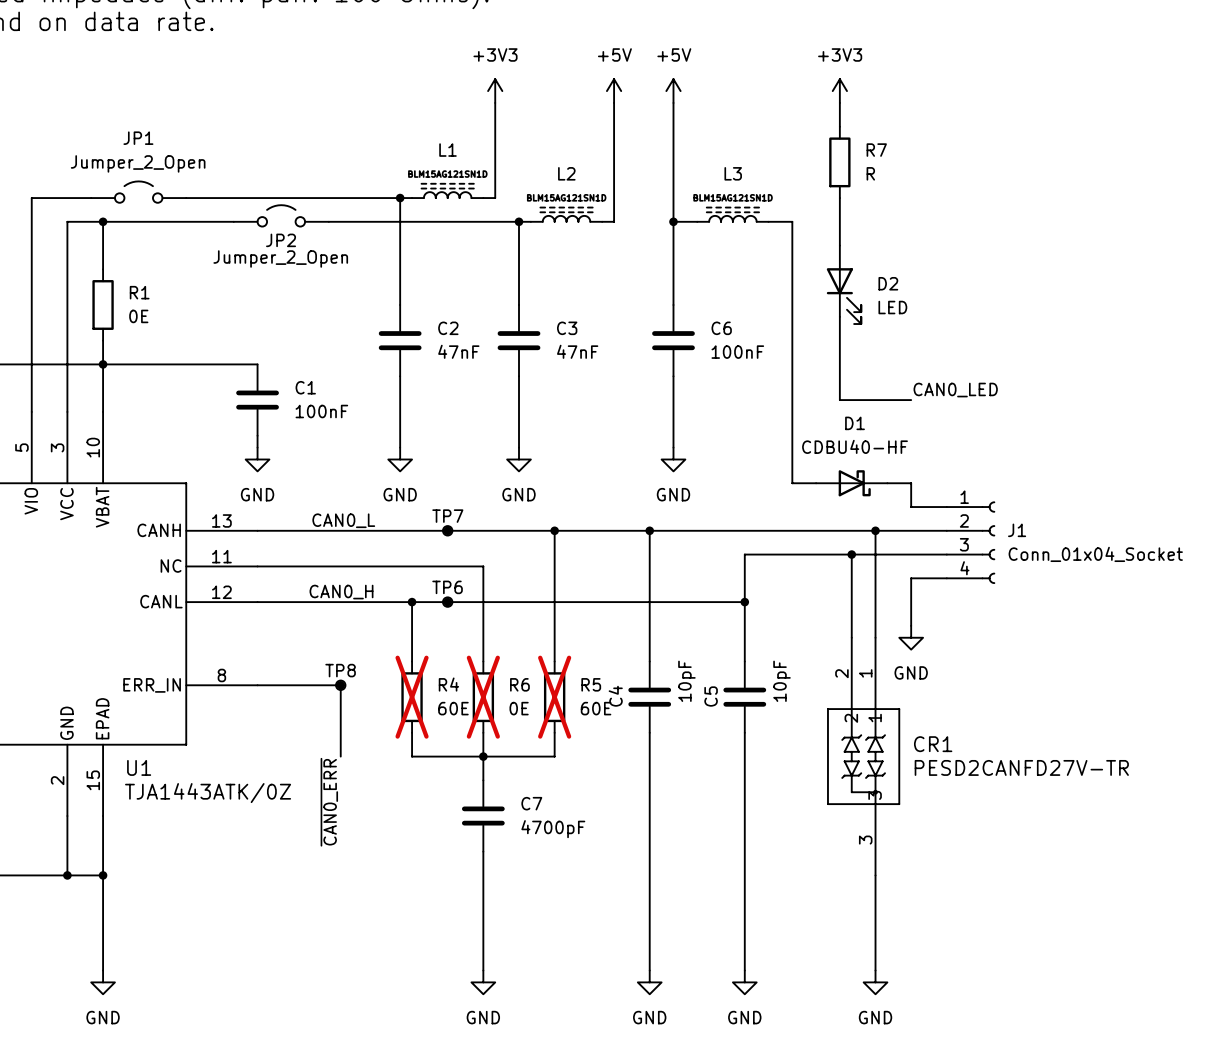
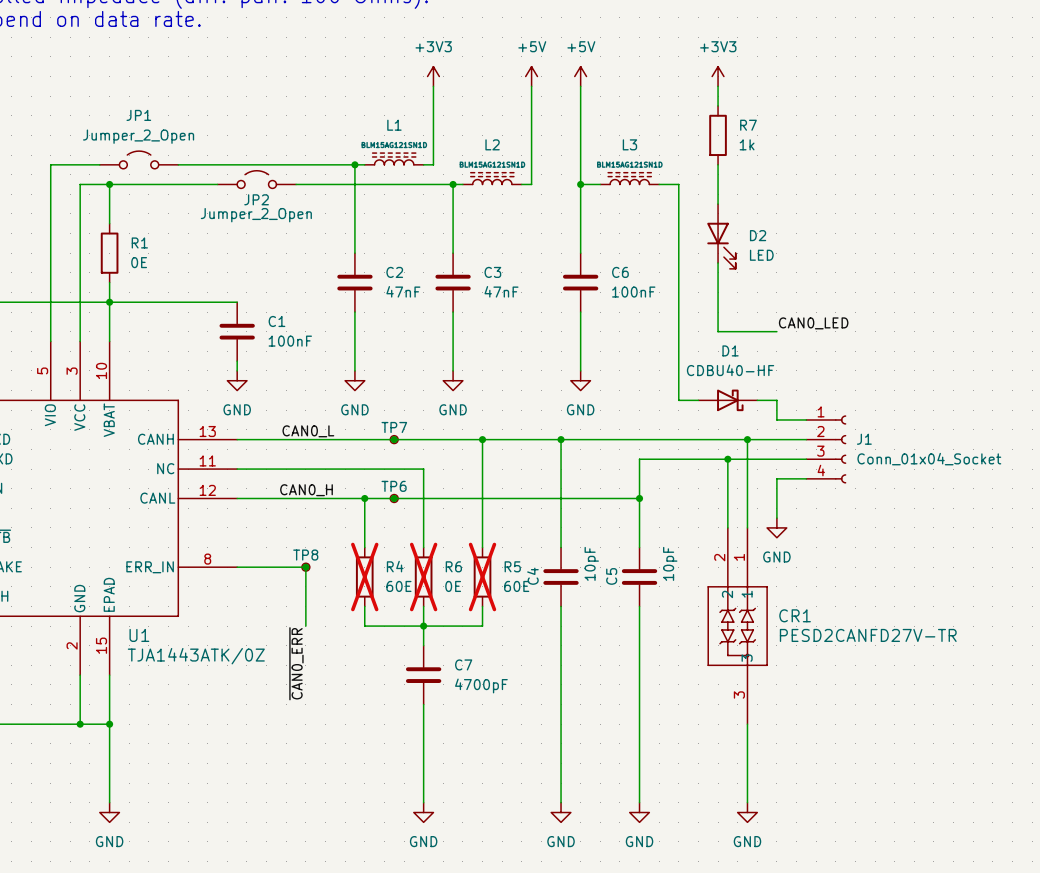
R7 value: R (870, 173) -> 1k (747, 144)

